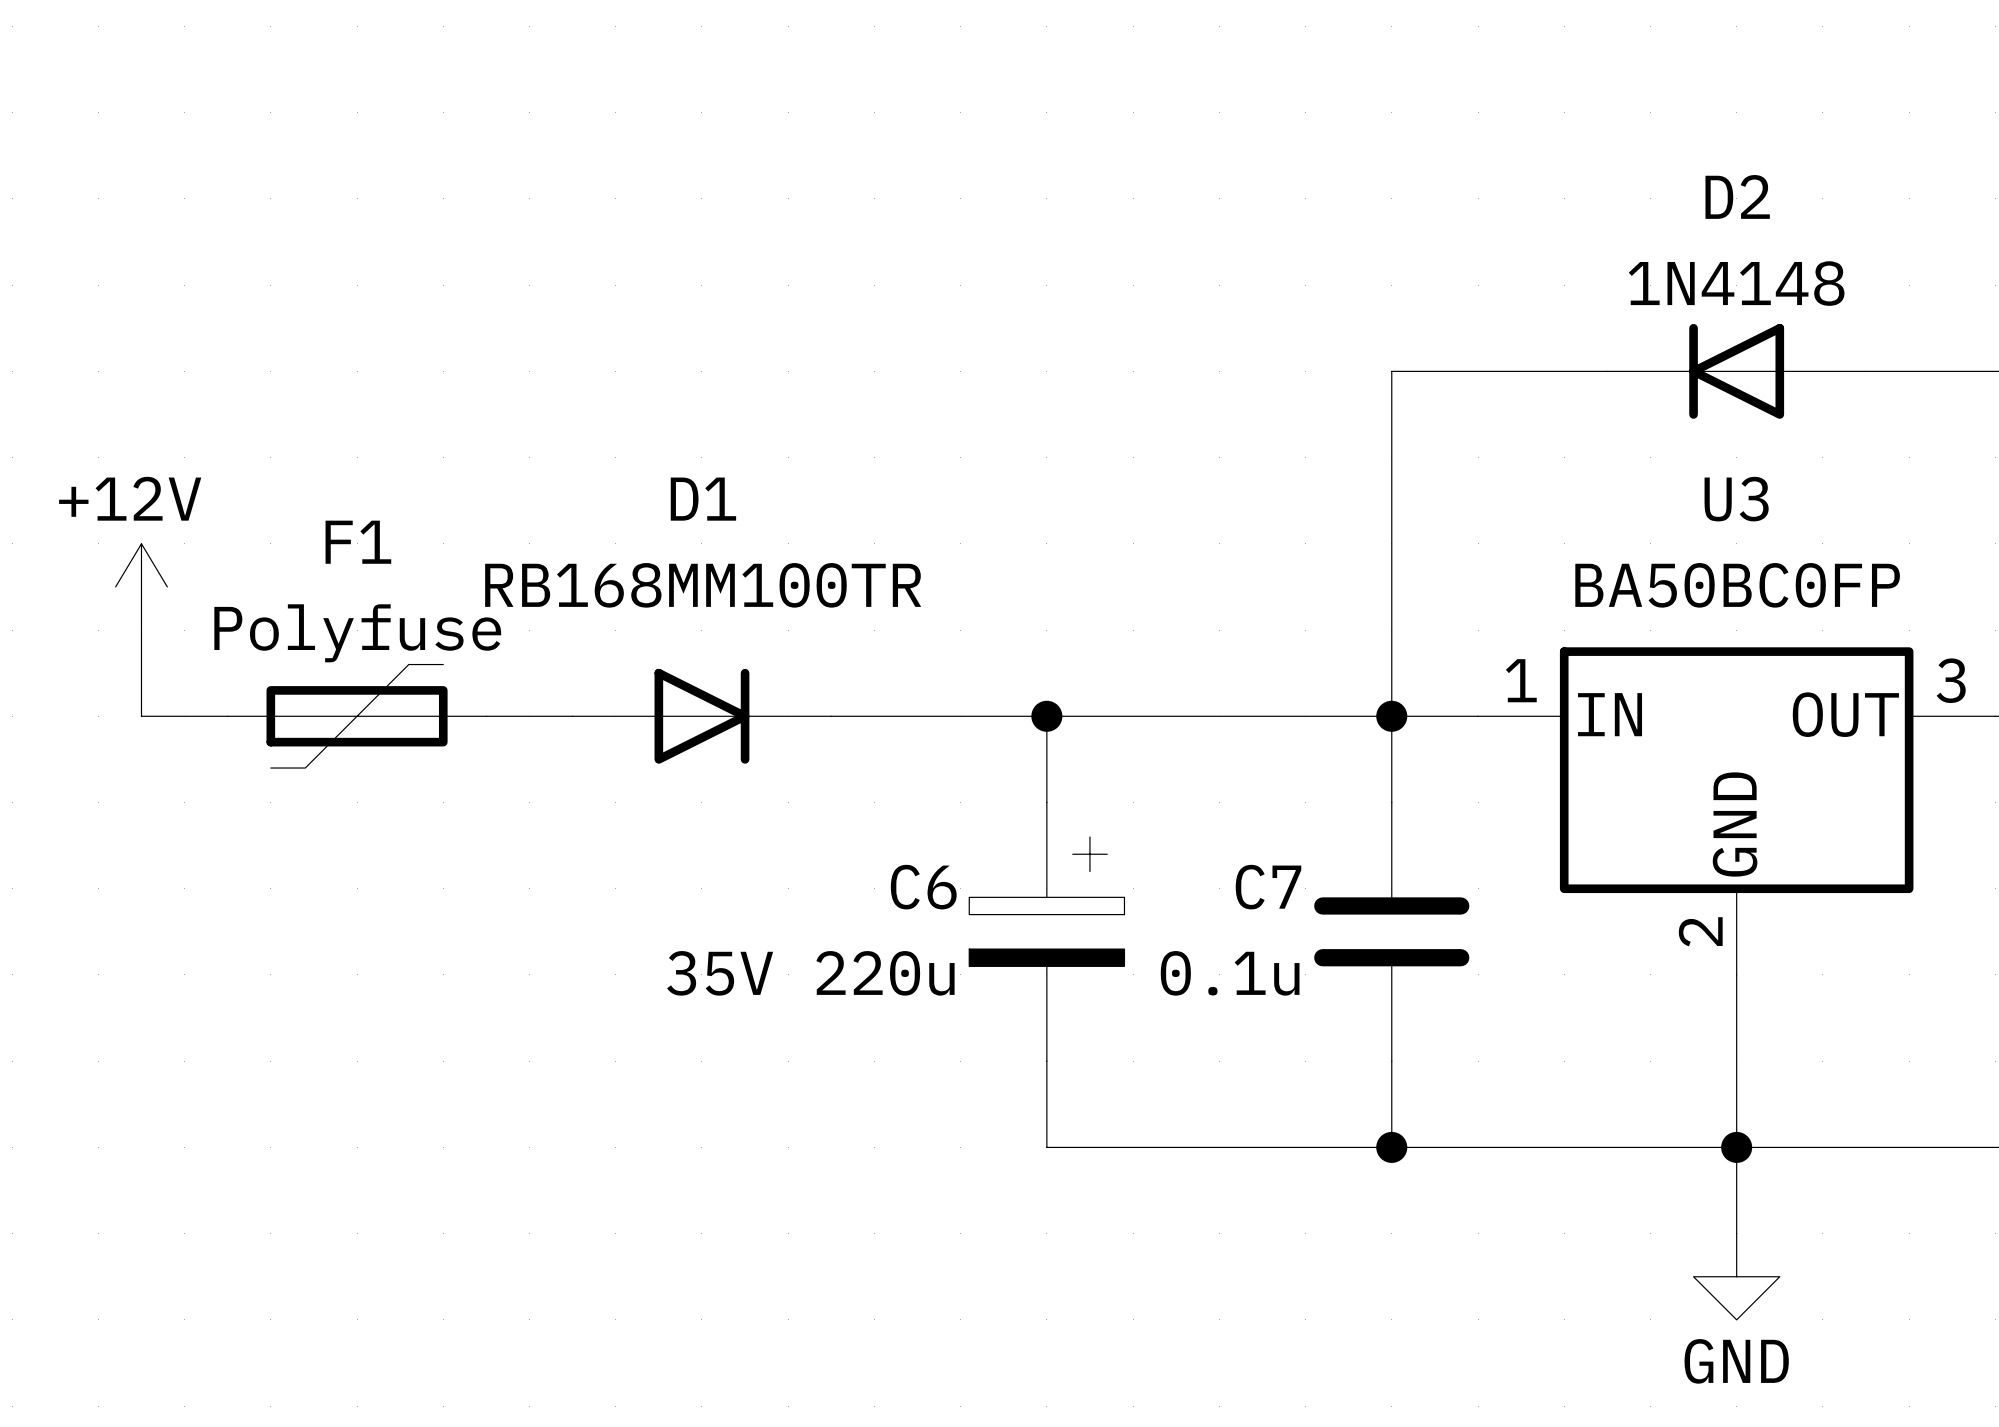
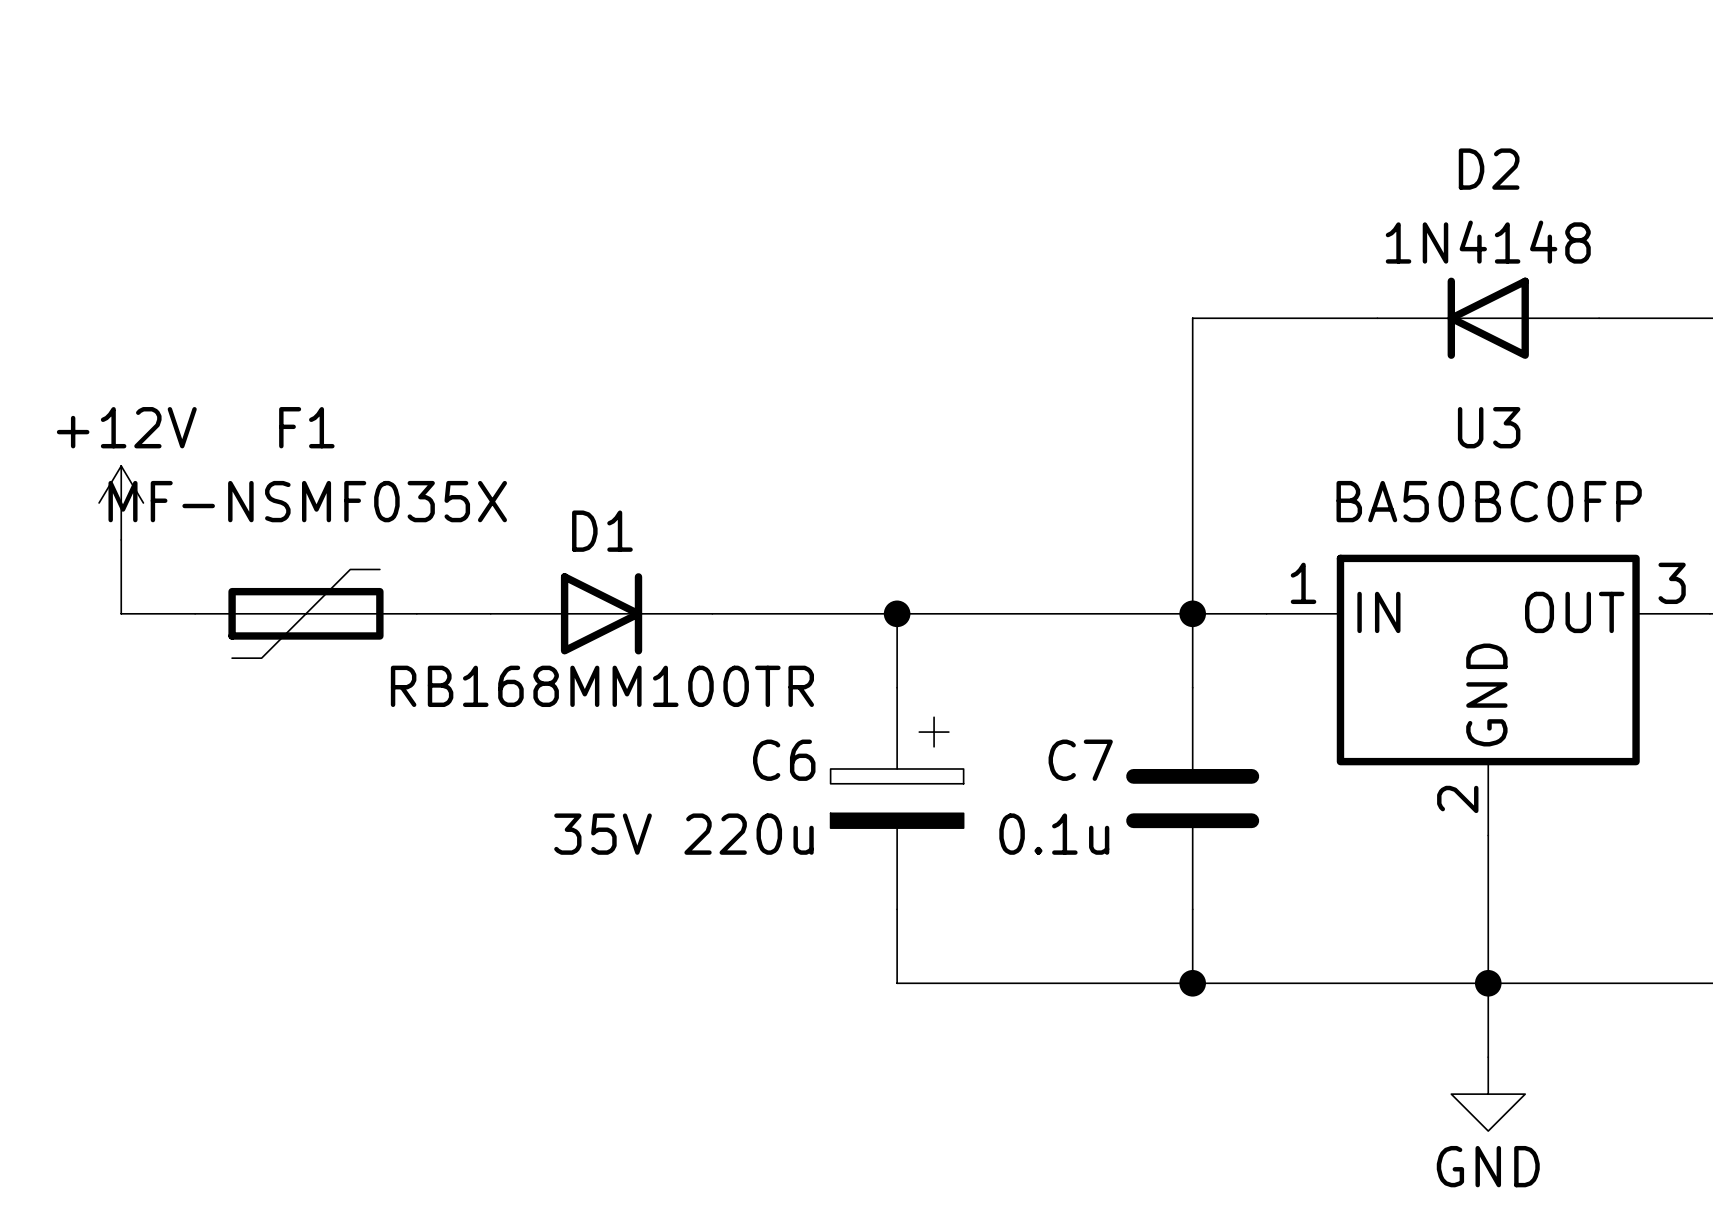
D1 name position: D1 (703, 499) -> D1 (602, 531)
F1 name position: F1 (358, 542) -> F1 (306, 427)
D1 value position: RB168MM100TR (703, 585) -> RB168MM100TR (602, 686)
F1 value: Polyfuse (357, 633) -> MF-NSMF035X (307, 501)

